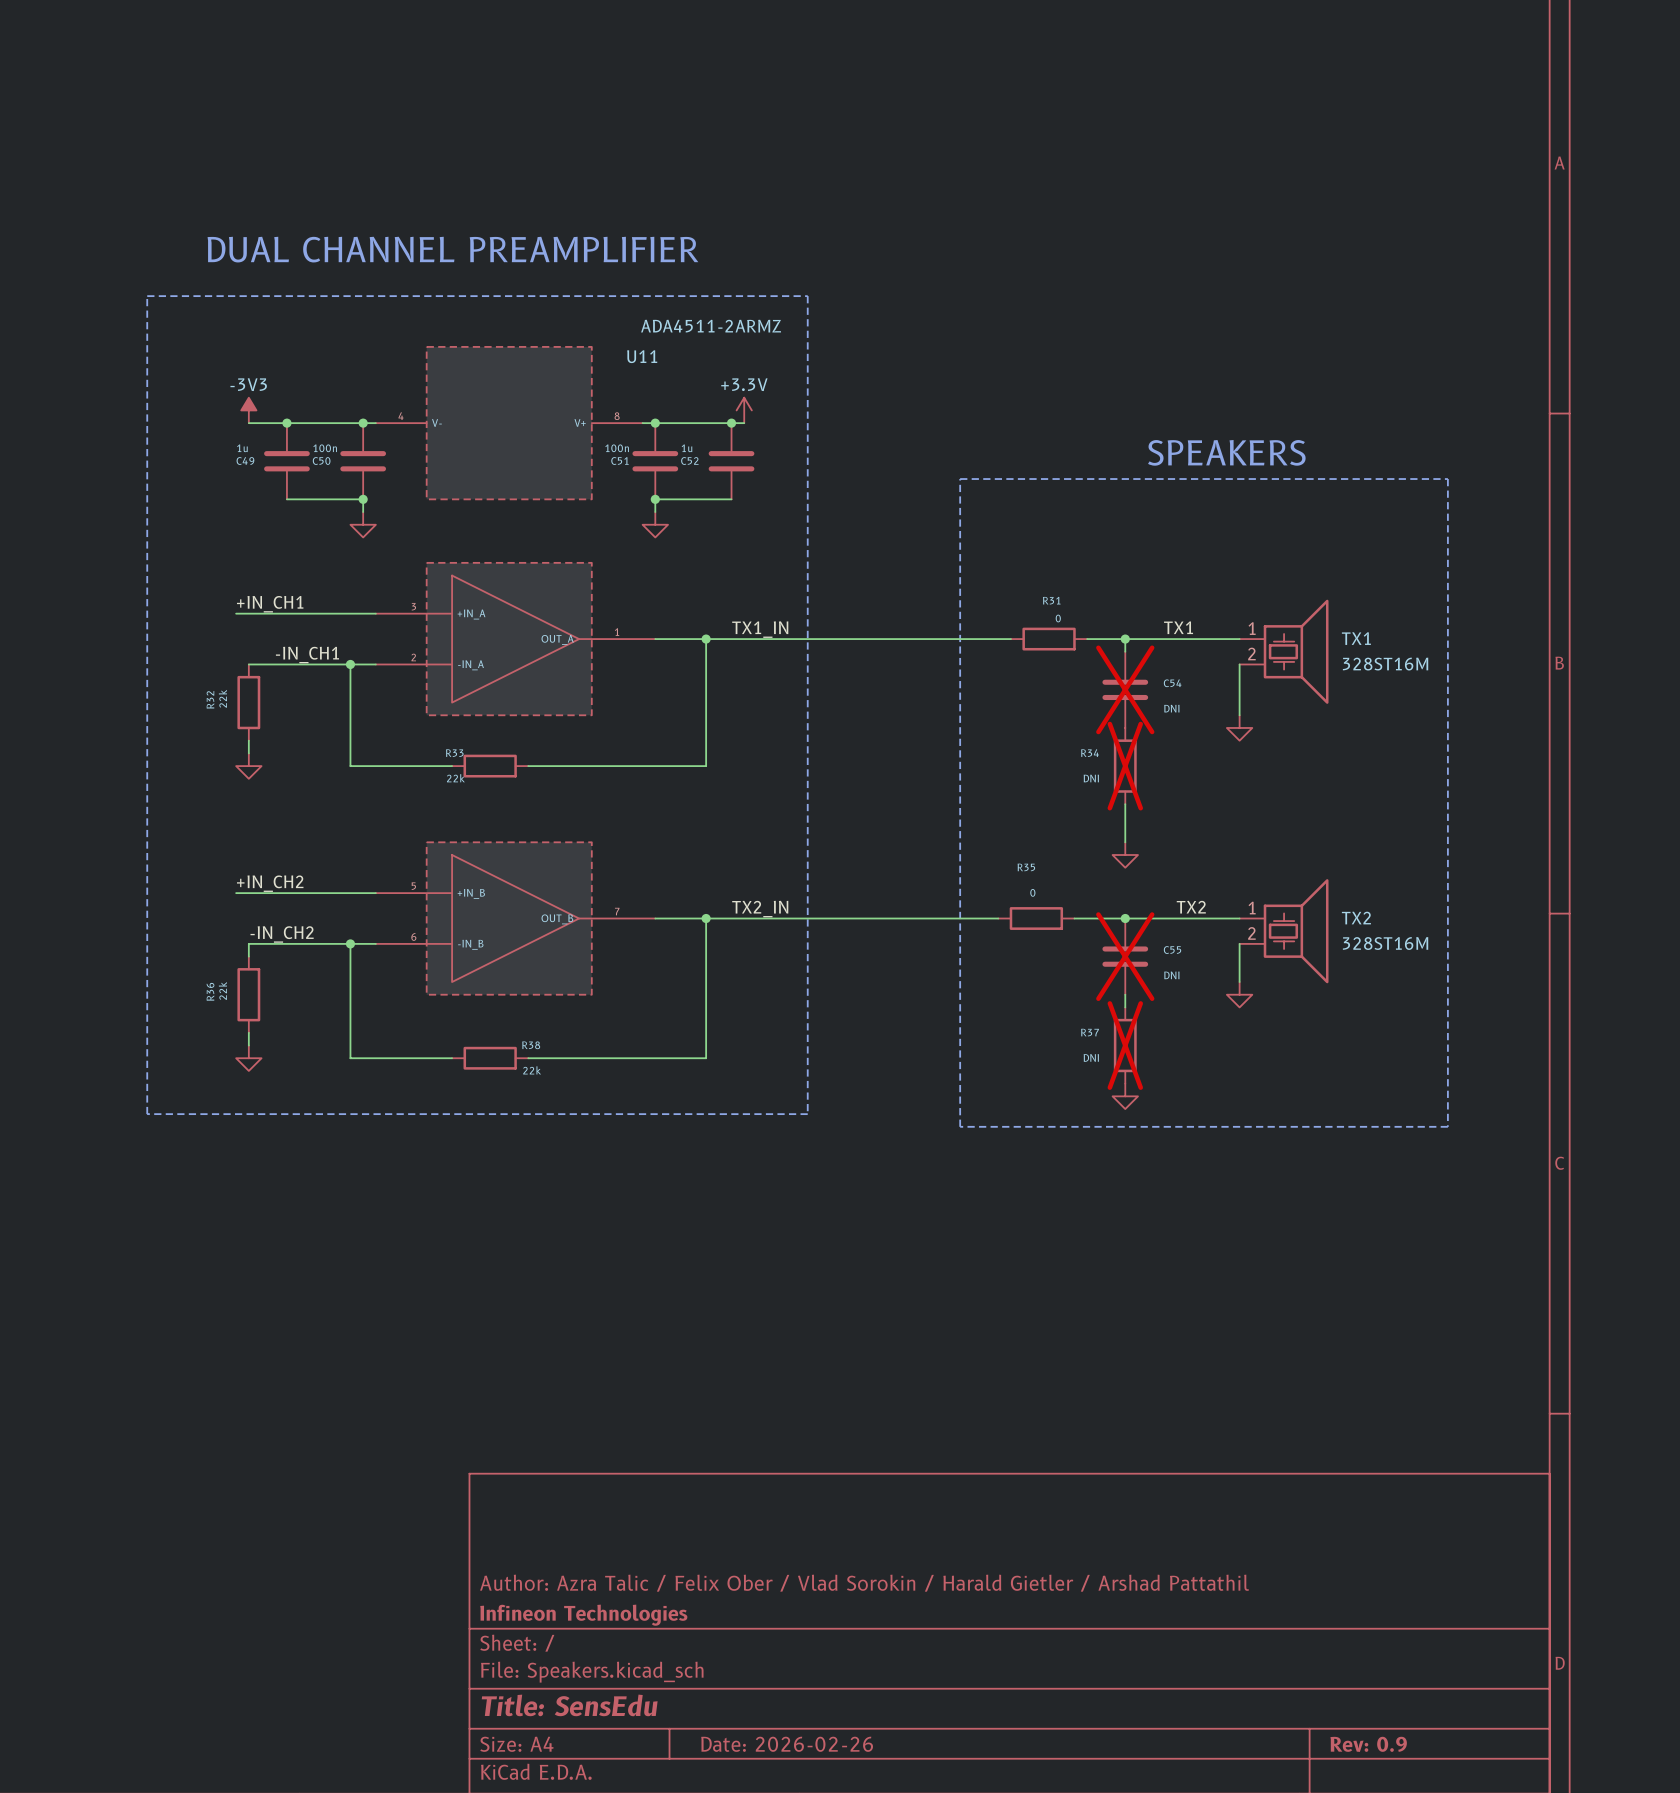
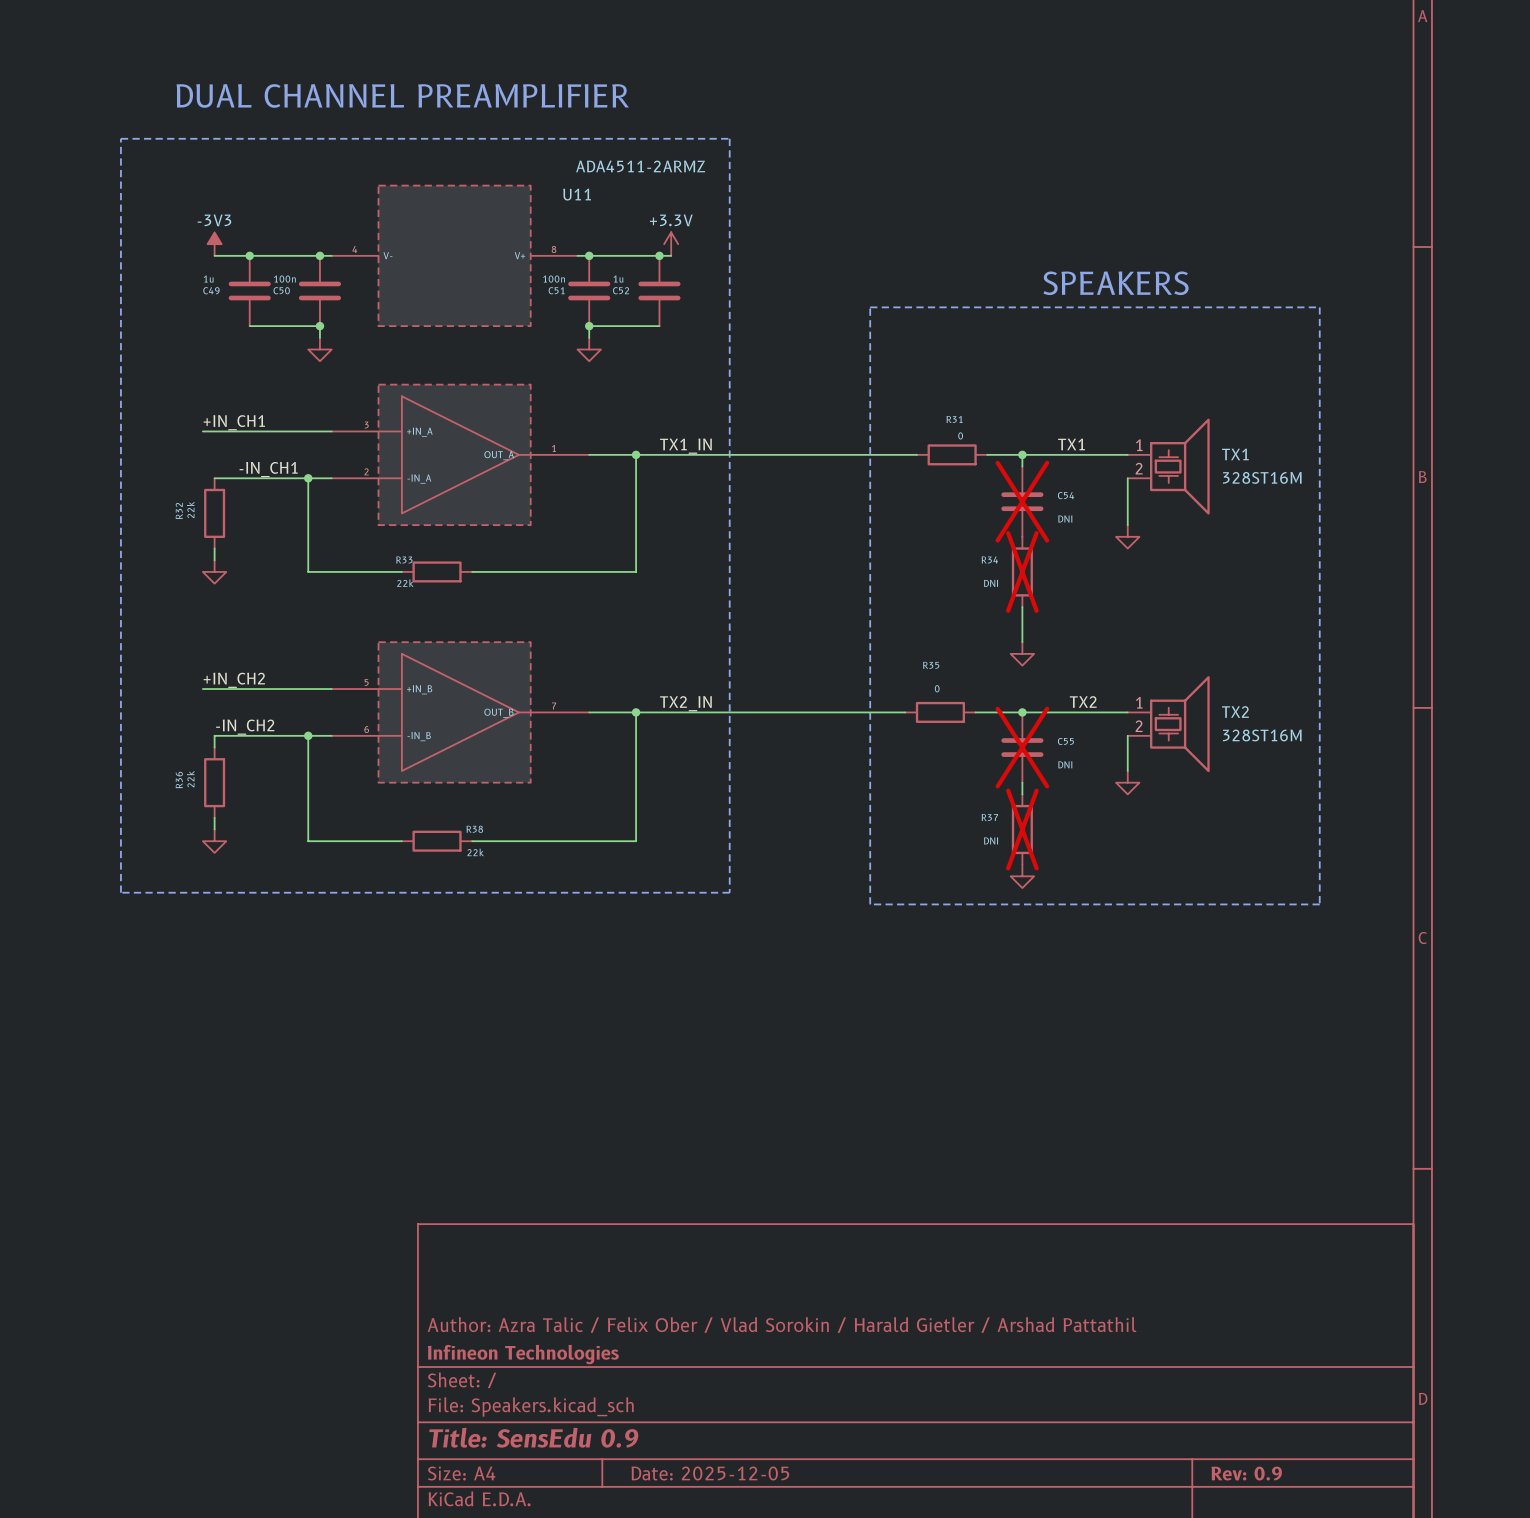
title block: Title: SensEdu (569, 1705) -> Title: SensEdu 0.9 (533, 1437)
title block: Date: 2026-02-26 (787, 1744) -> Date: 2025-12-05 (710, 1473)

